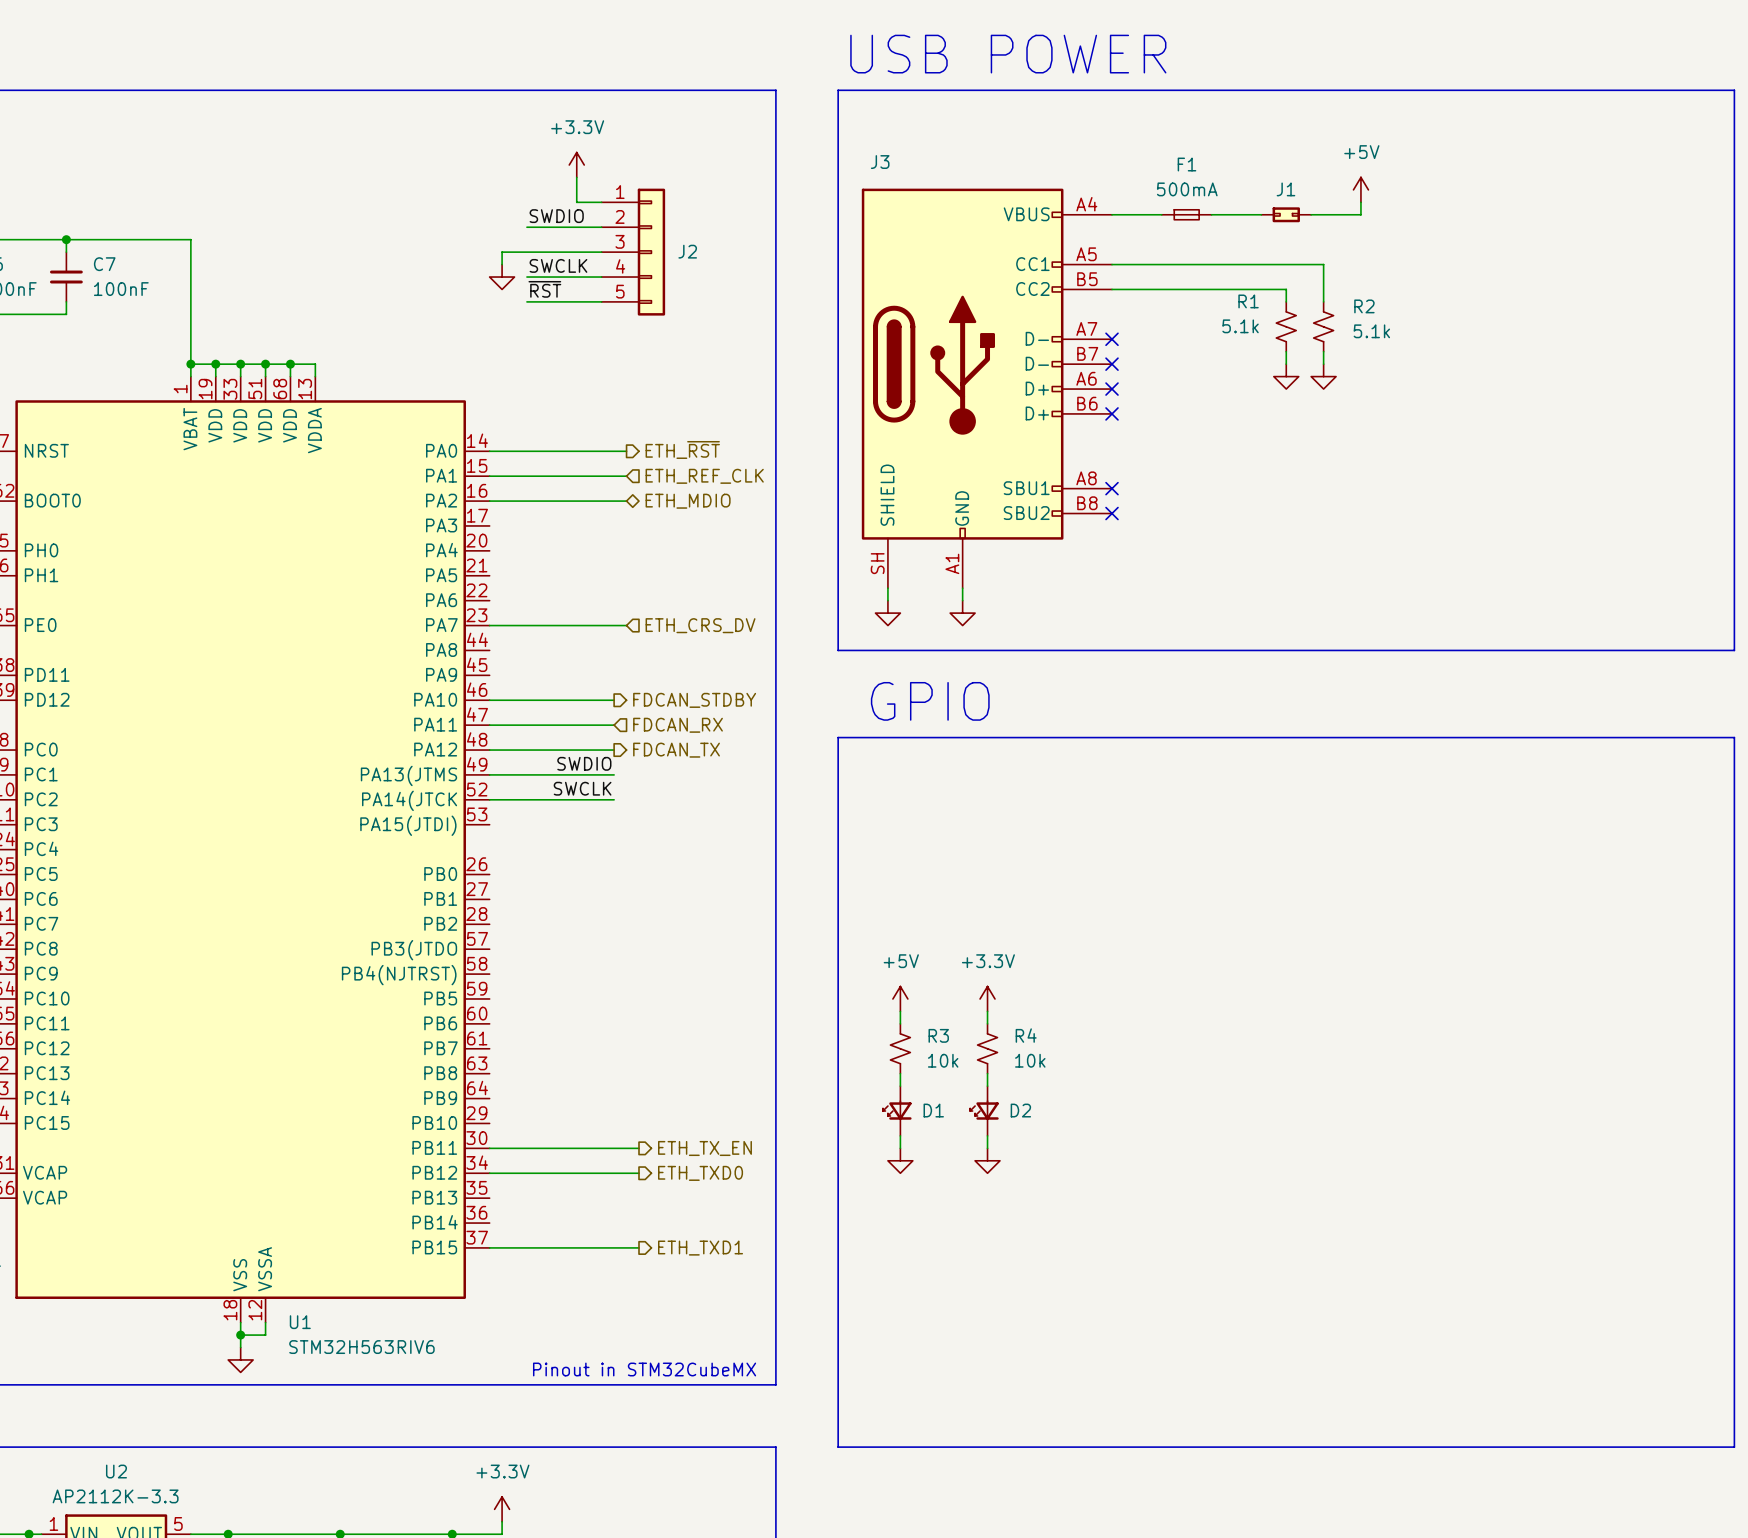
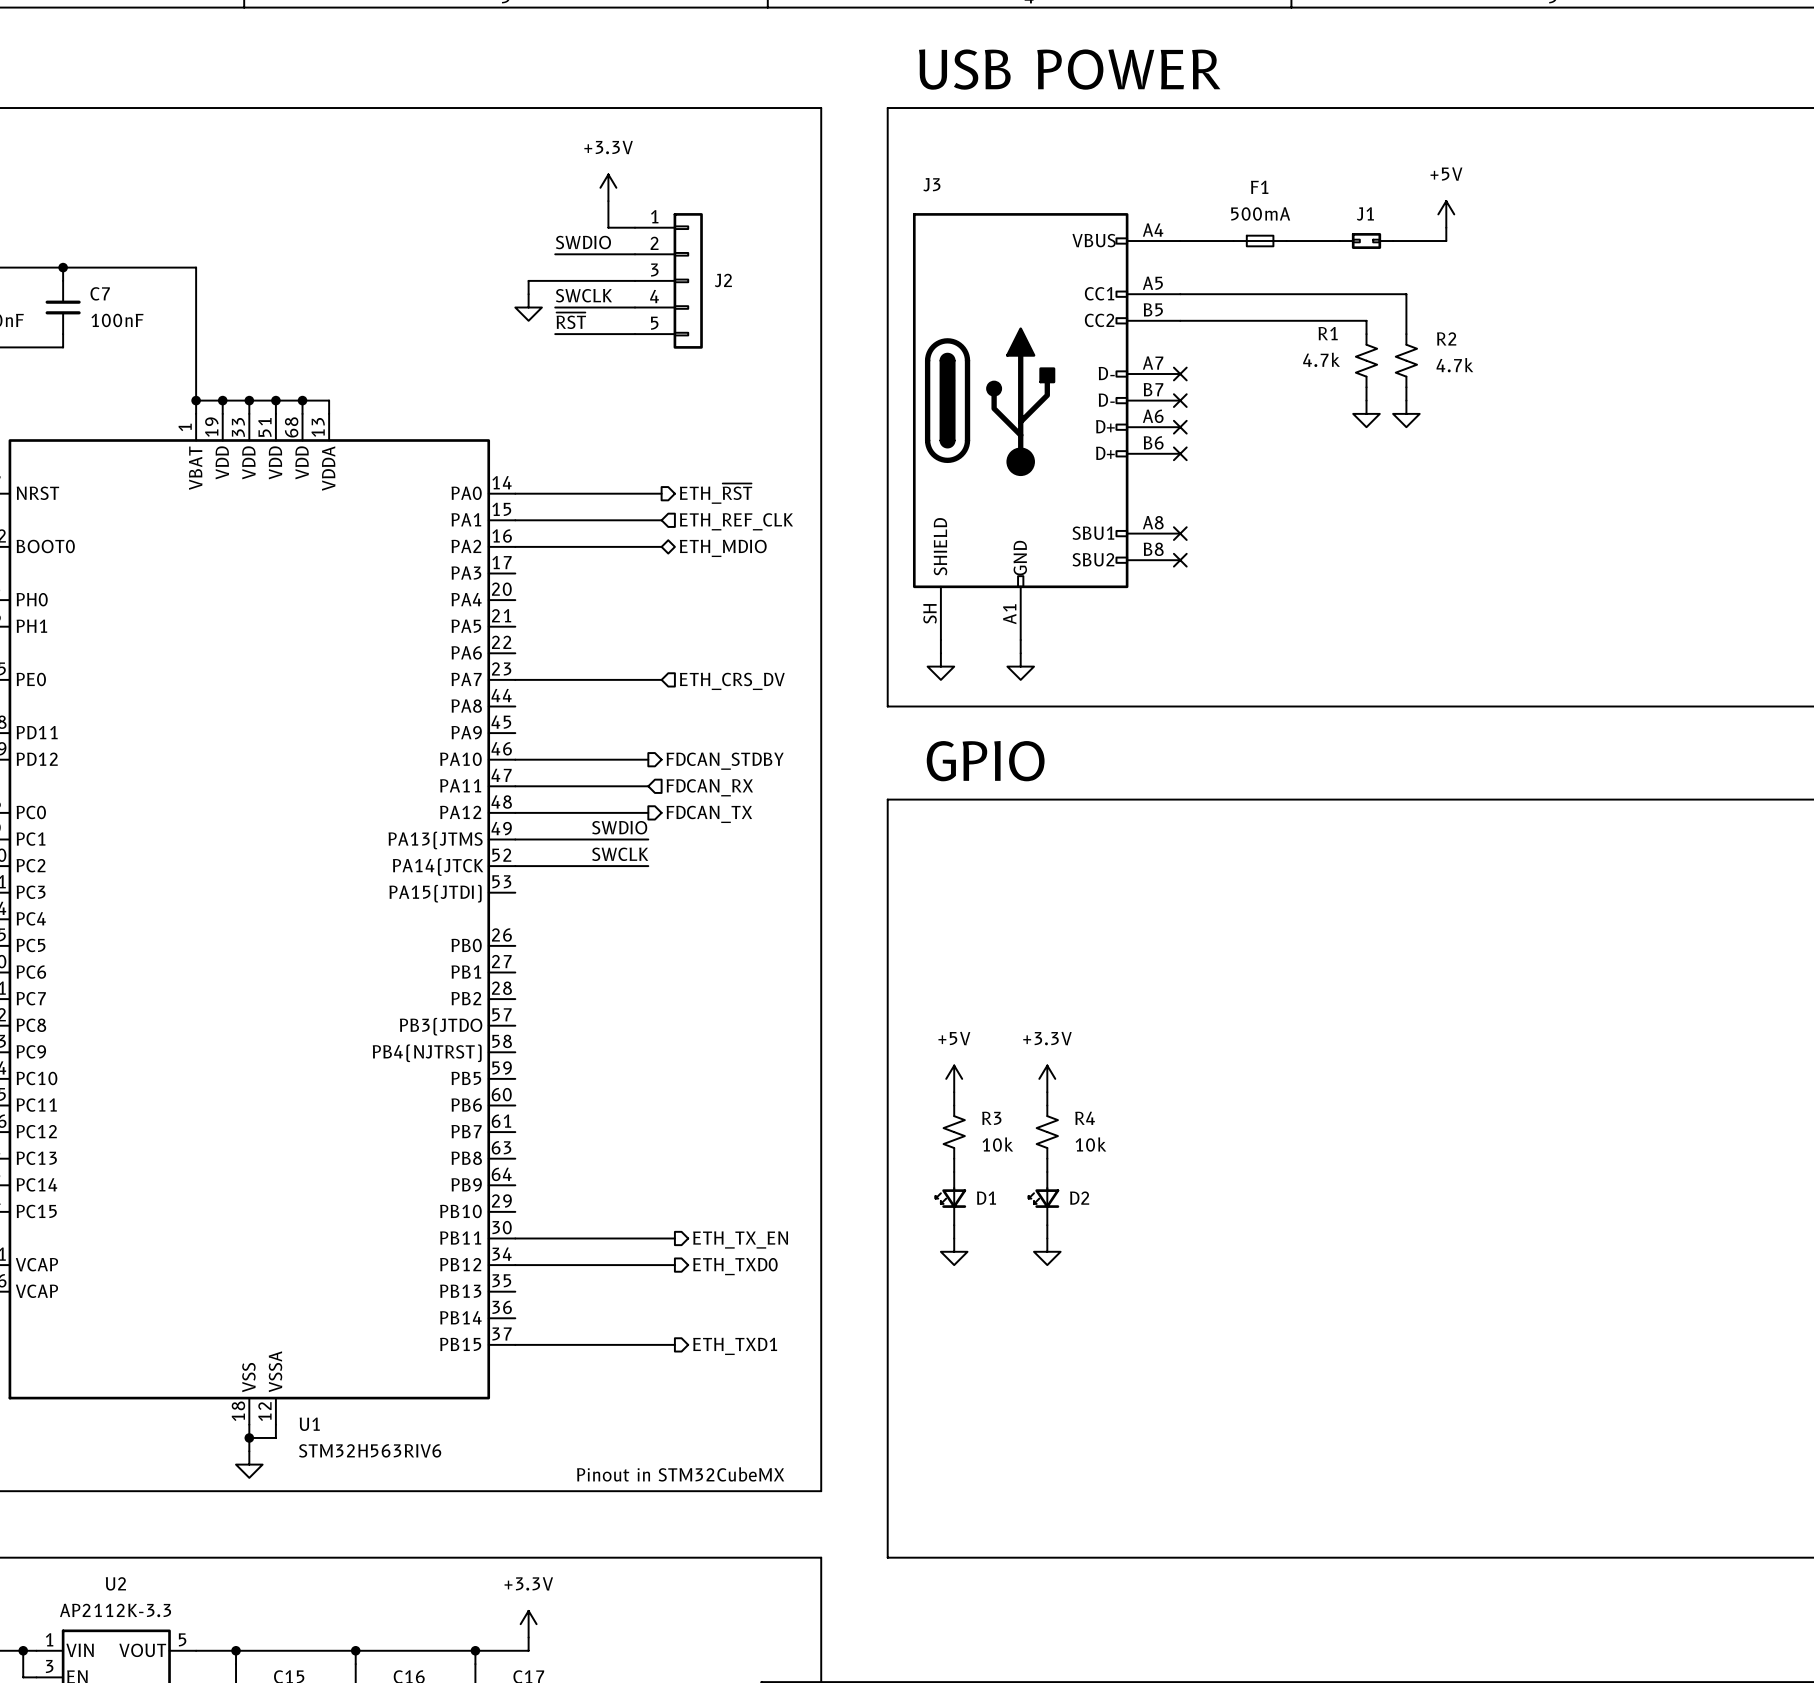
R1 value: 5.1k (1240, 326) -> 4.7k (1321, 359)
R2 value: 5.1k (1371, 331) -> 4.7k (1454, 365)

